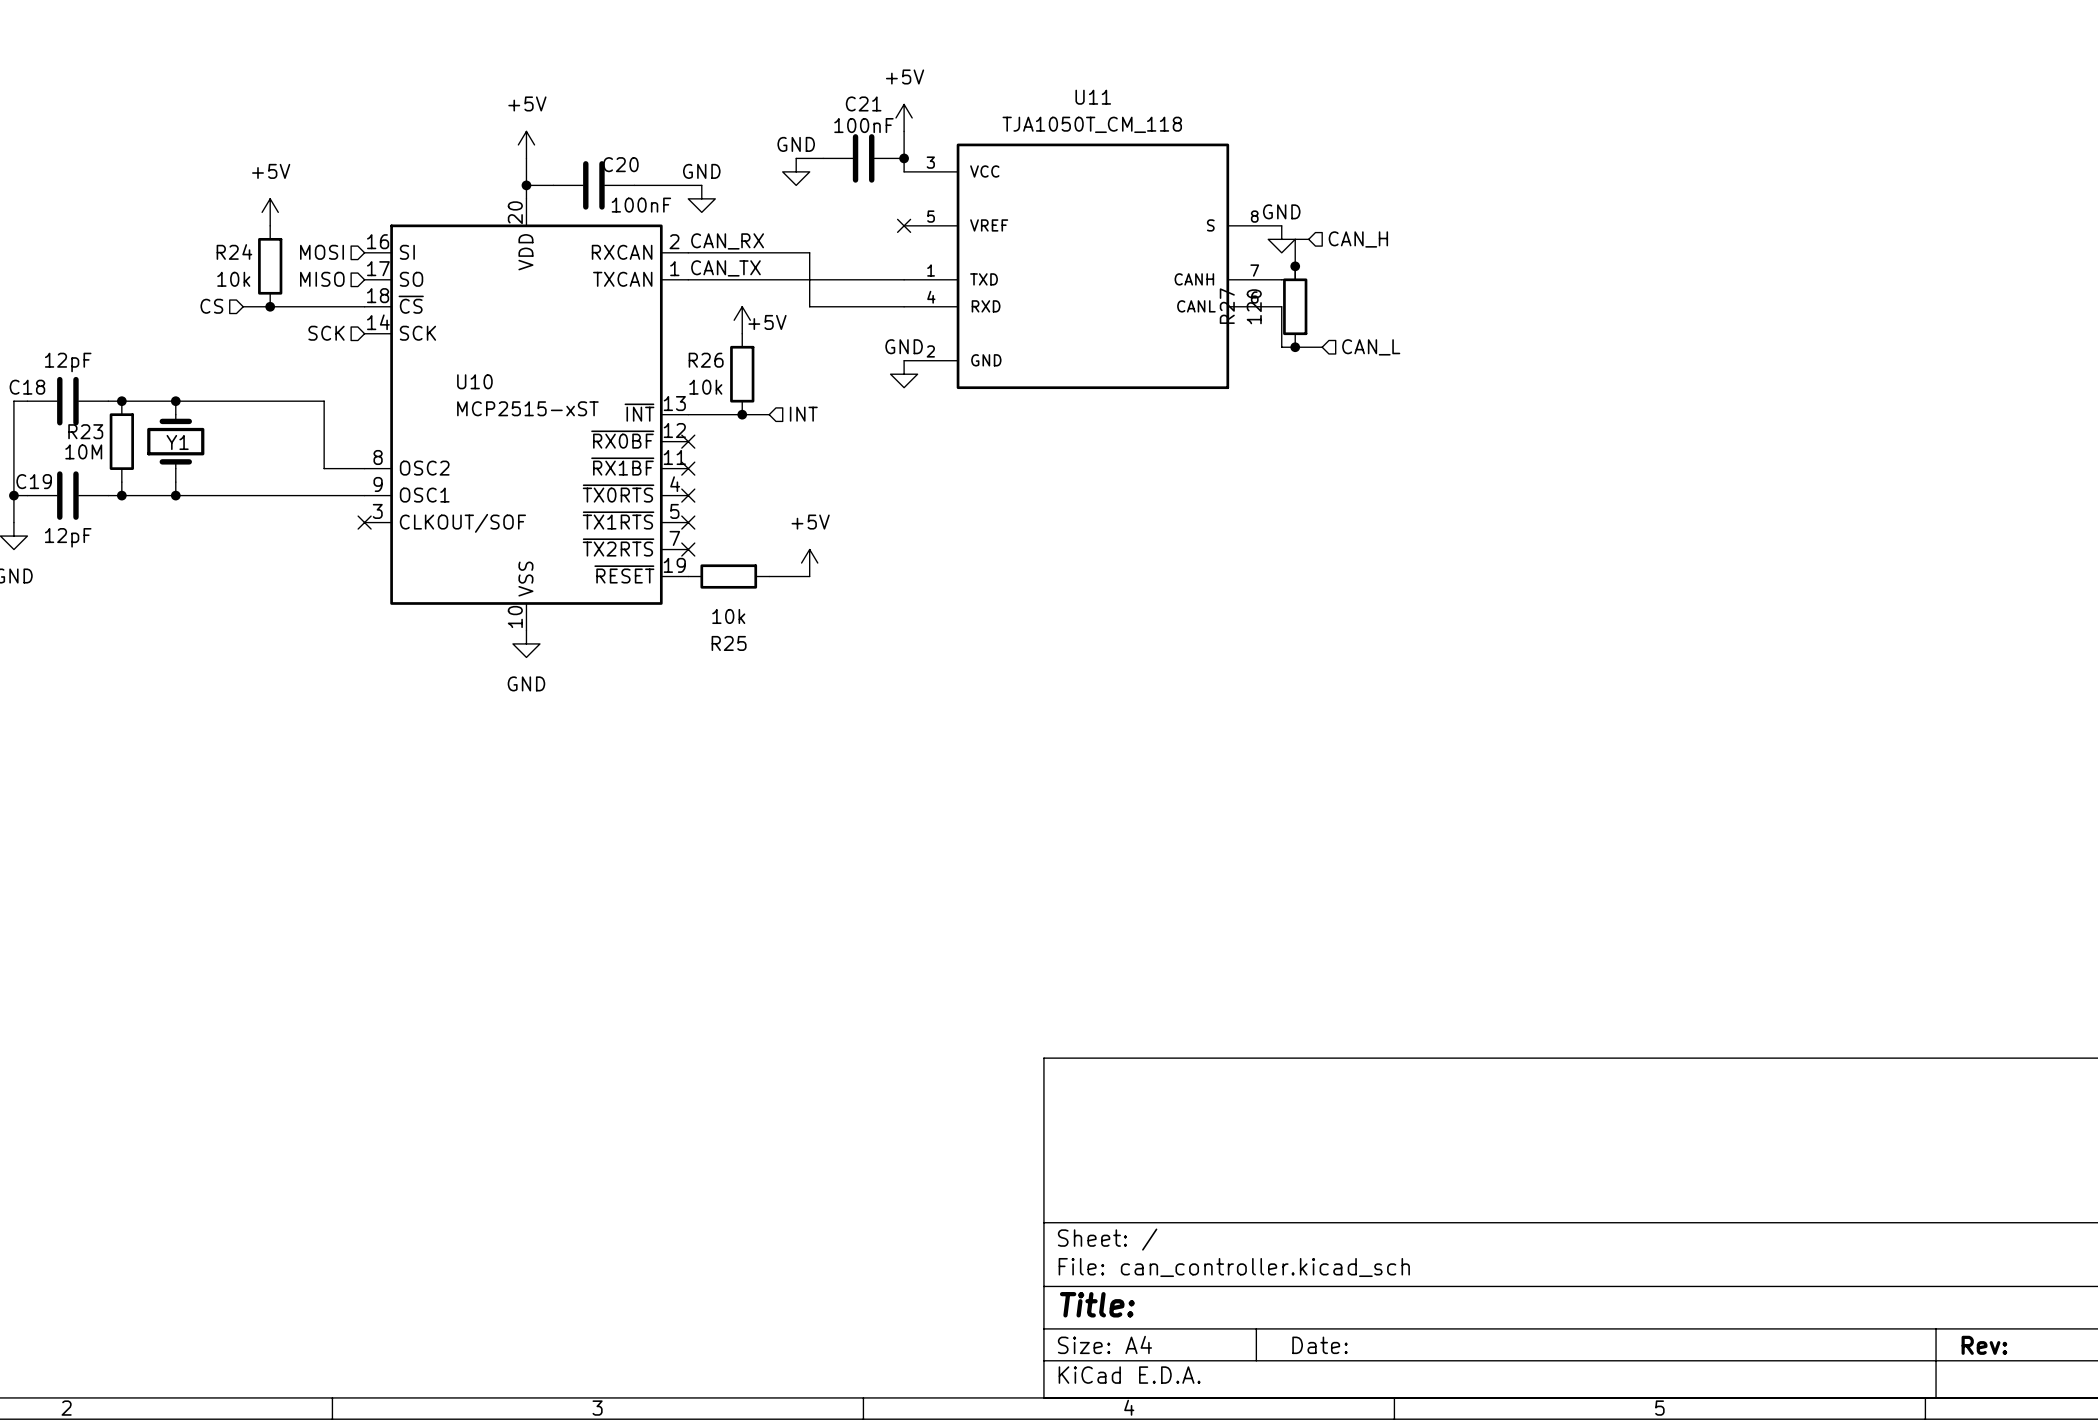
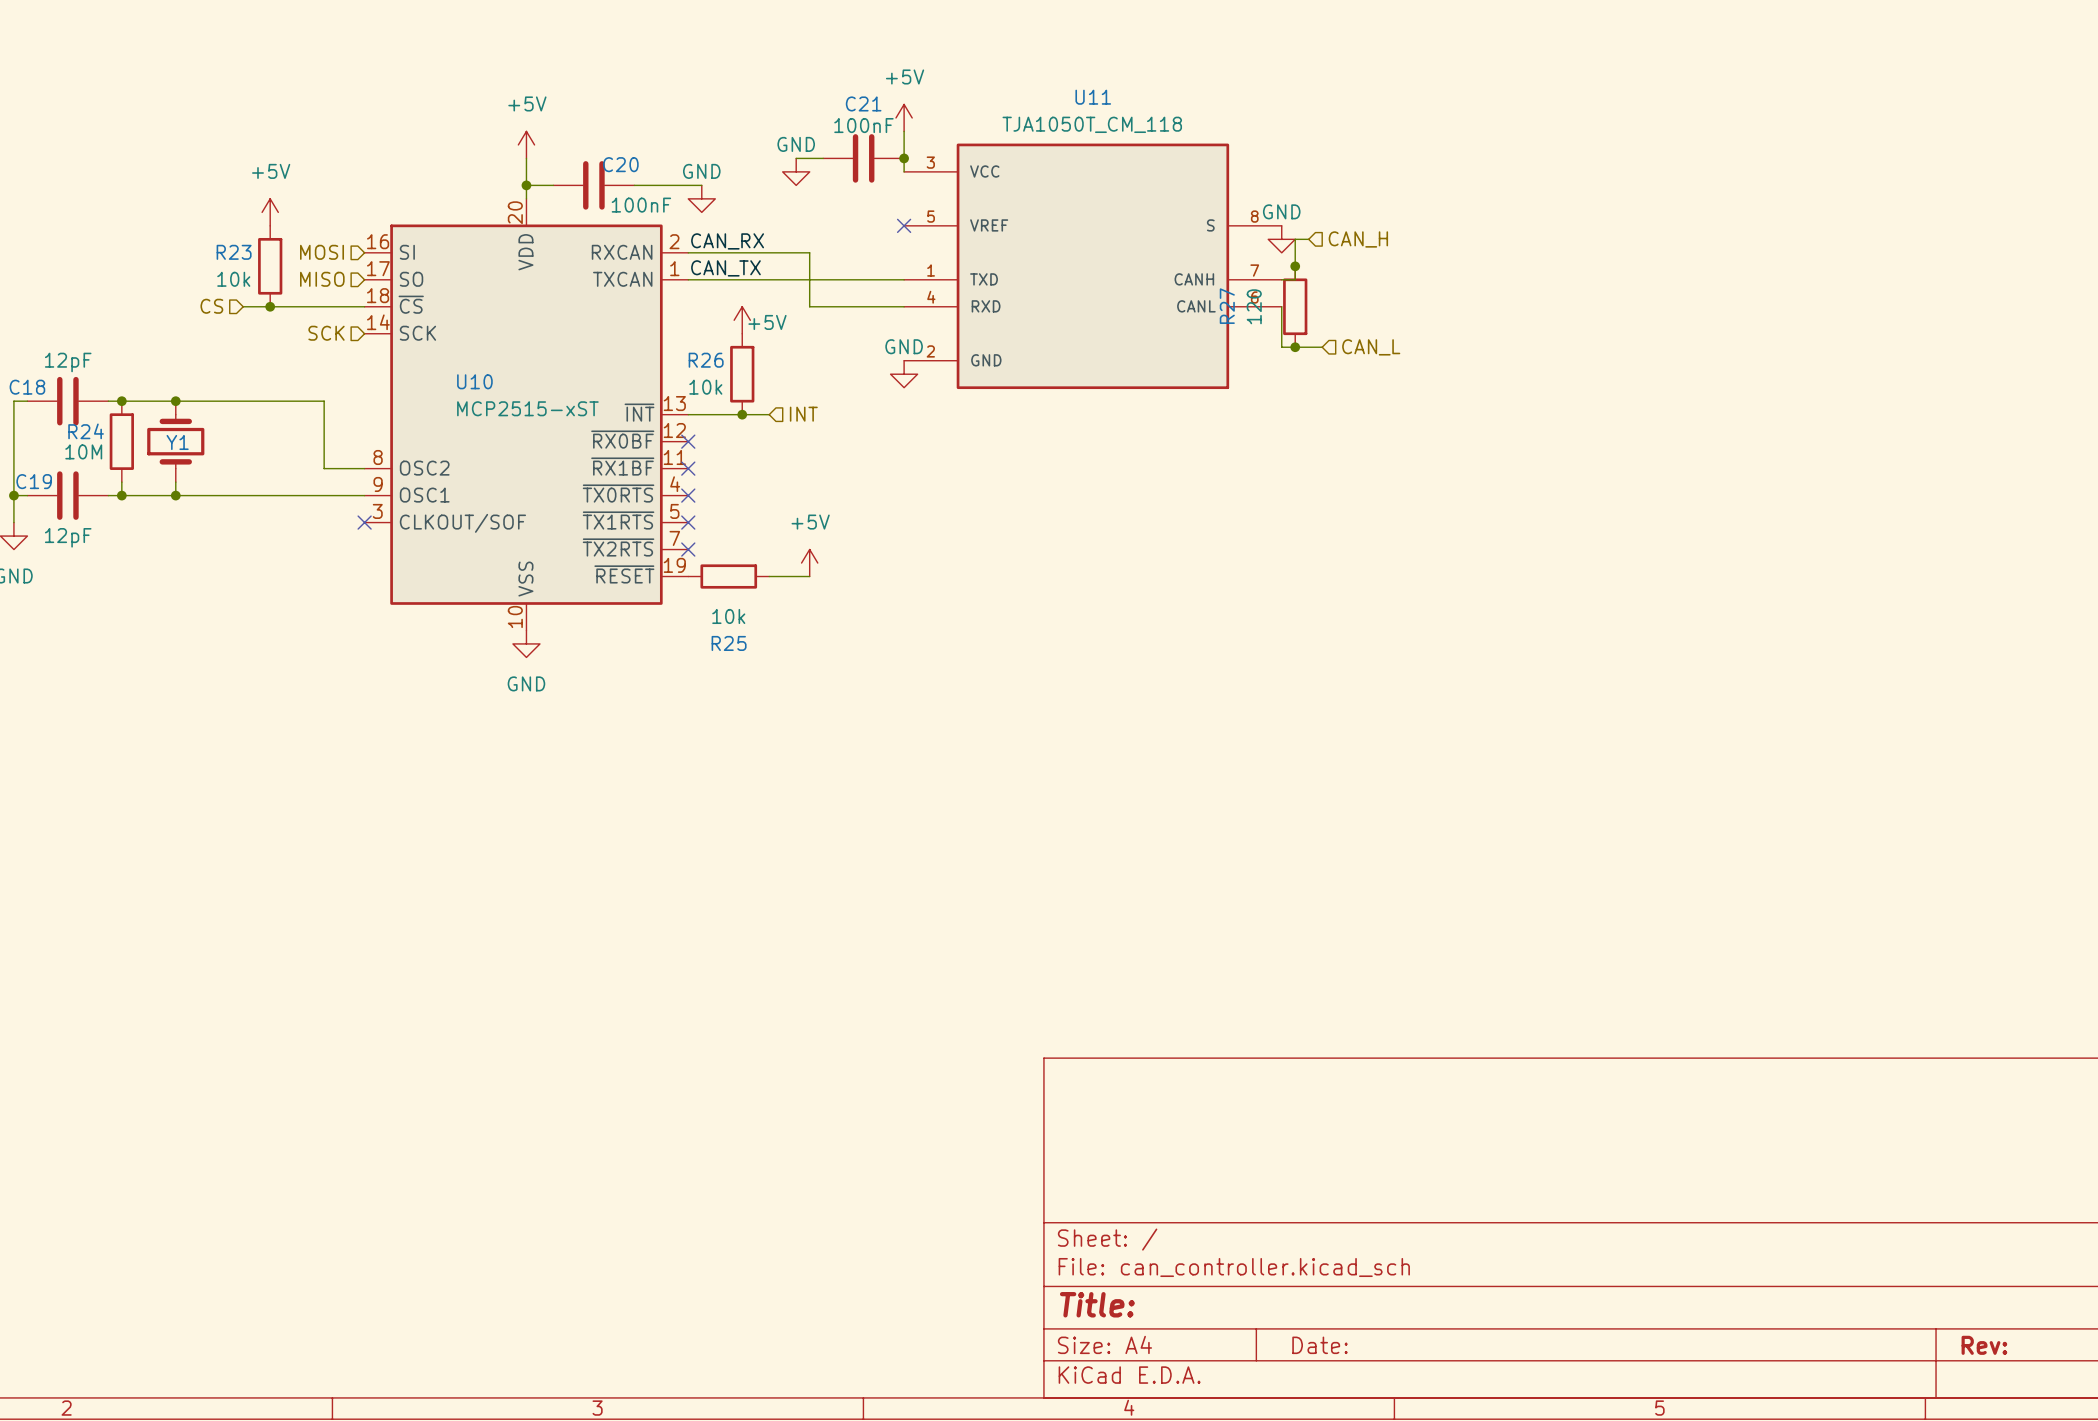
R24 name: R24 (234, 252) -> R23 (234, 252)
R23 name: R23 (85, 431) -> R24 (86, 431)

